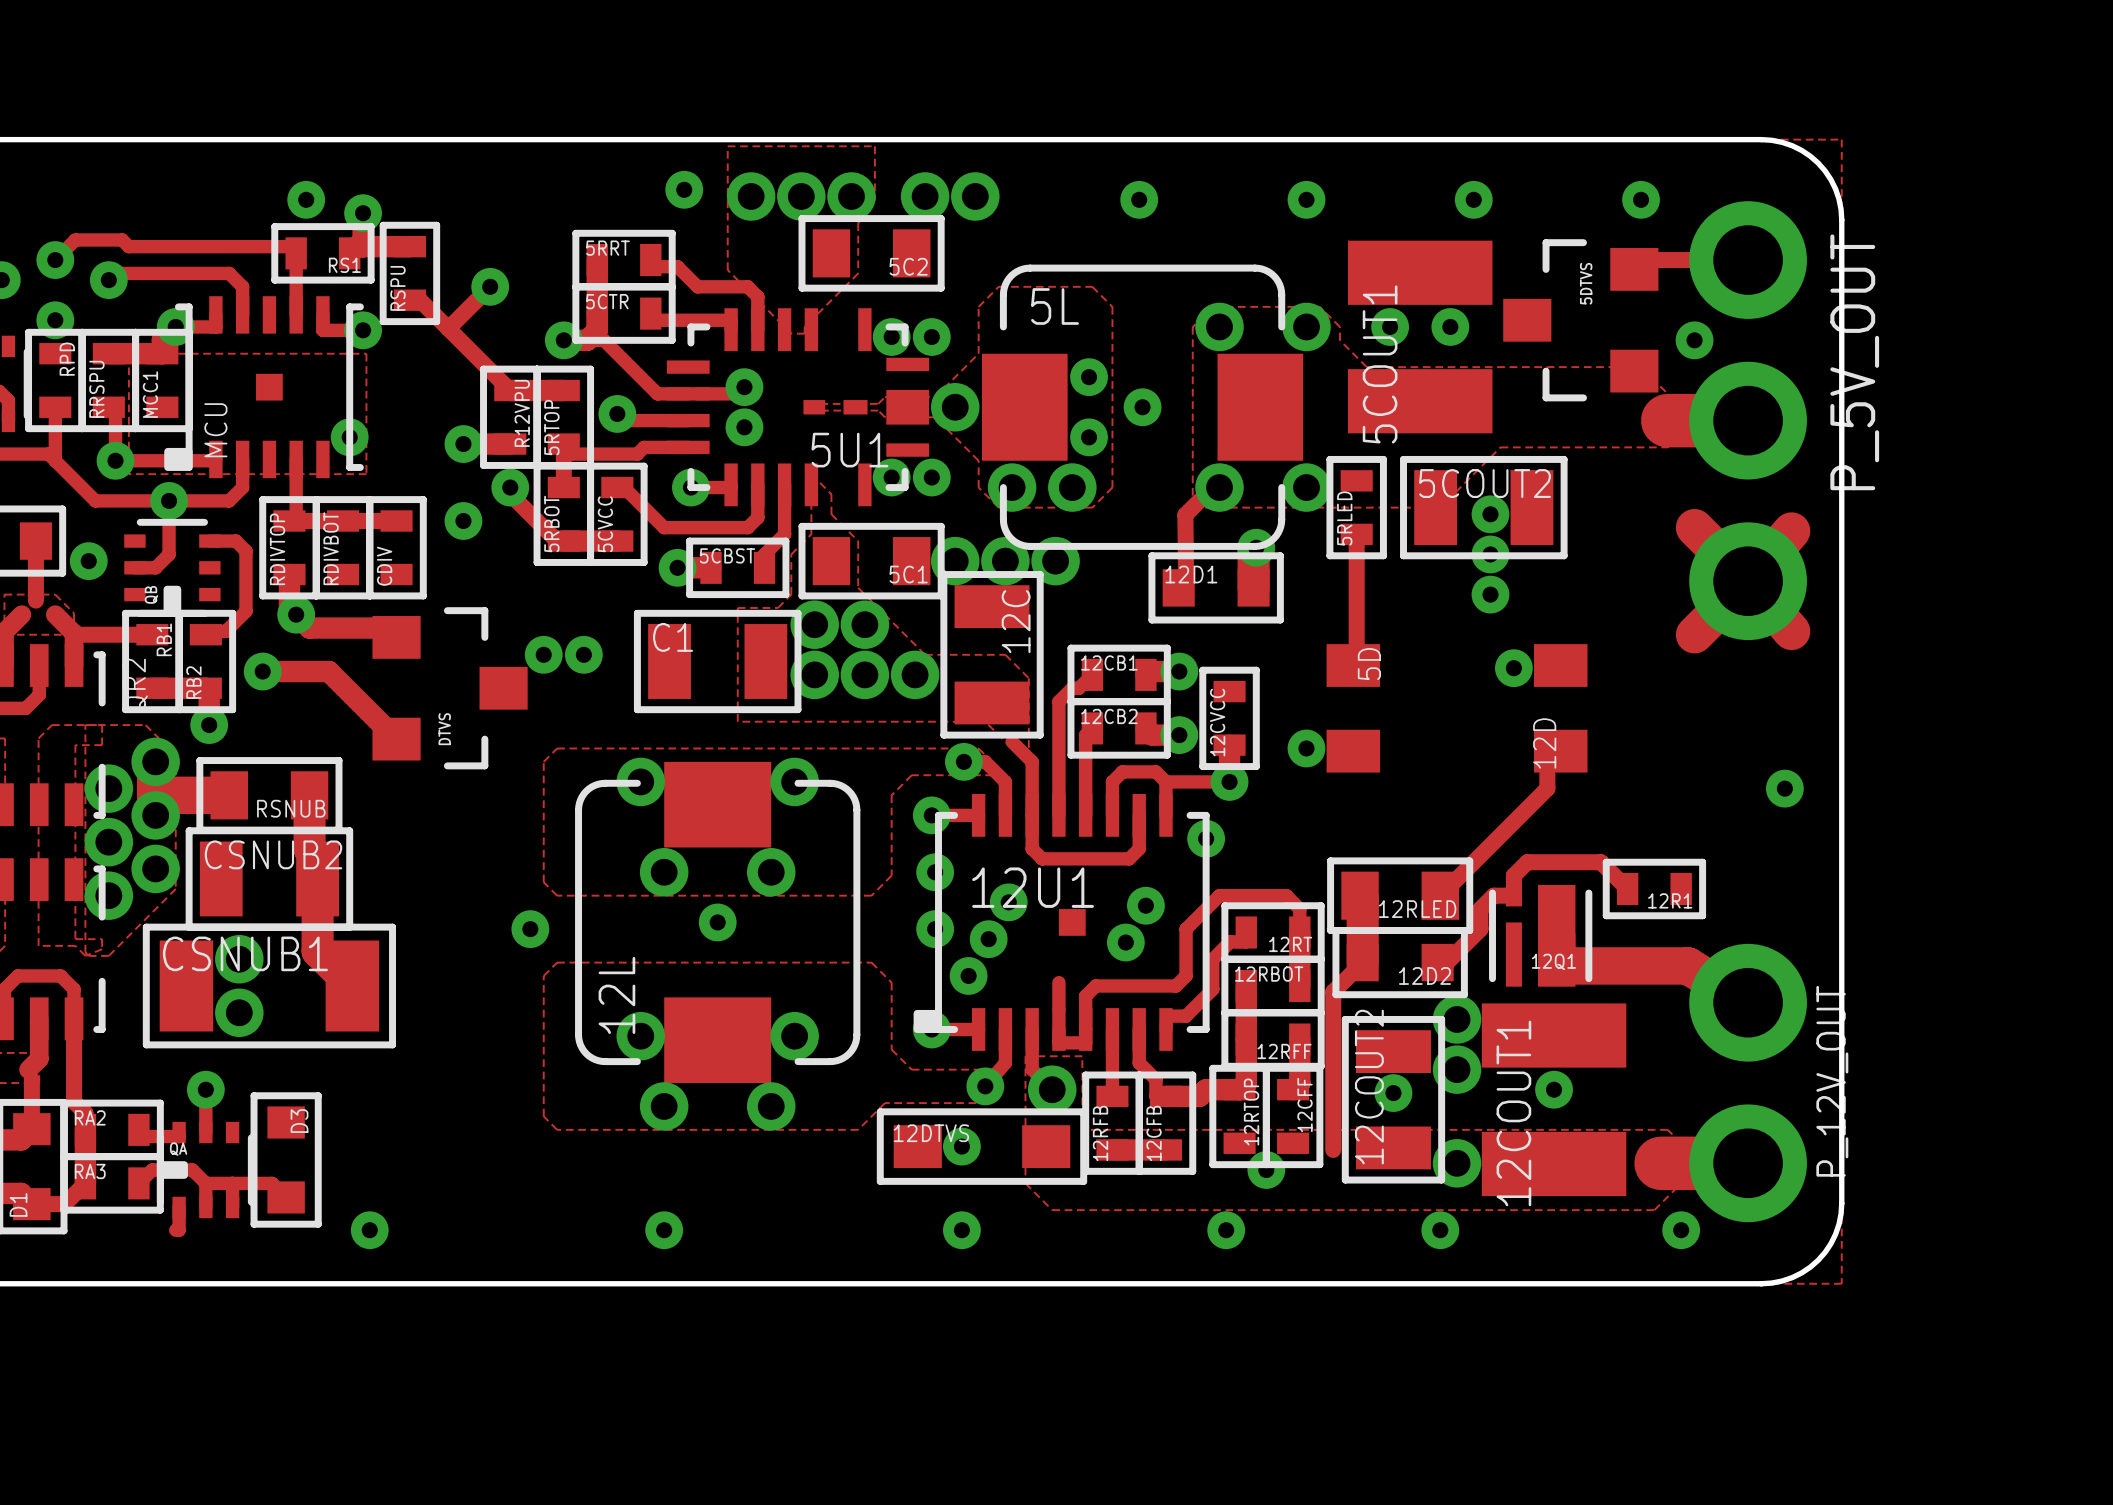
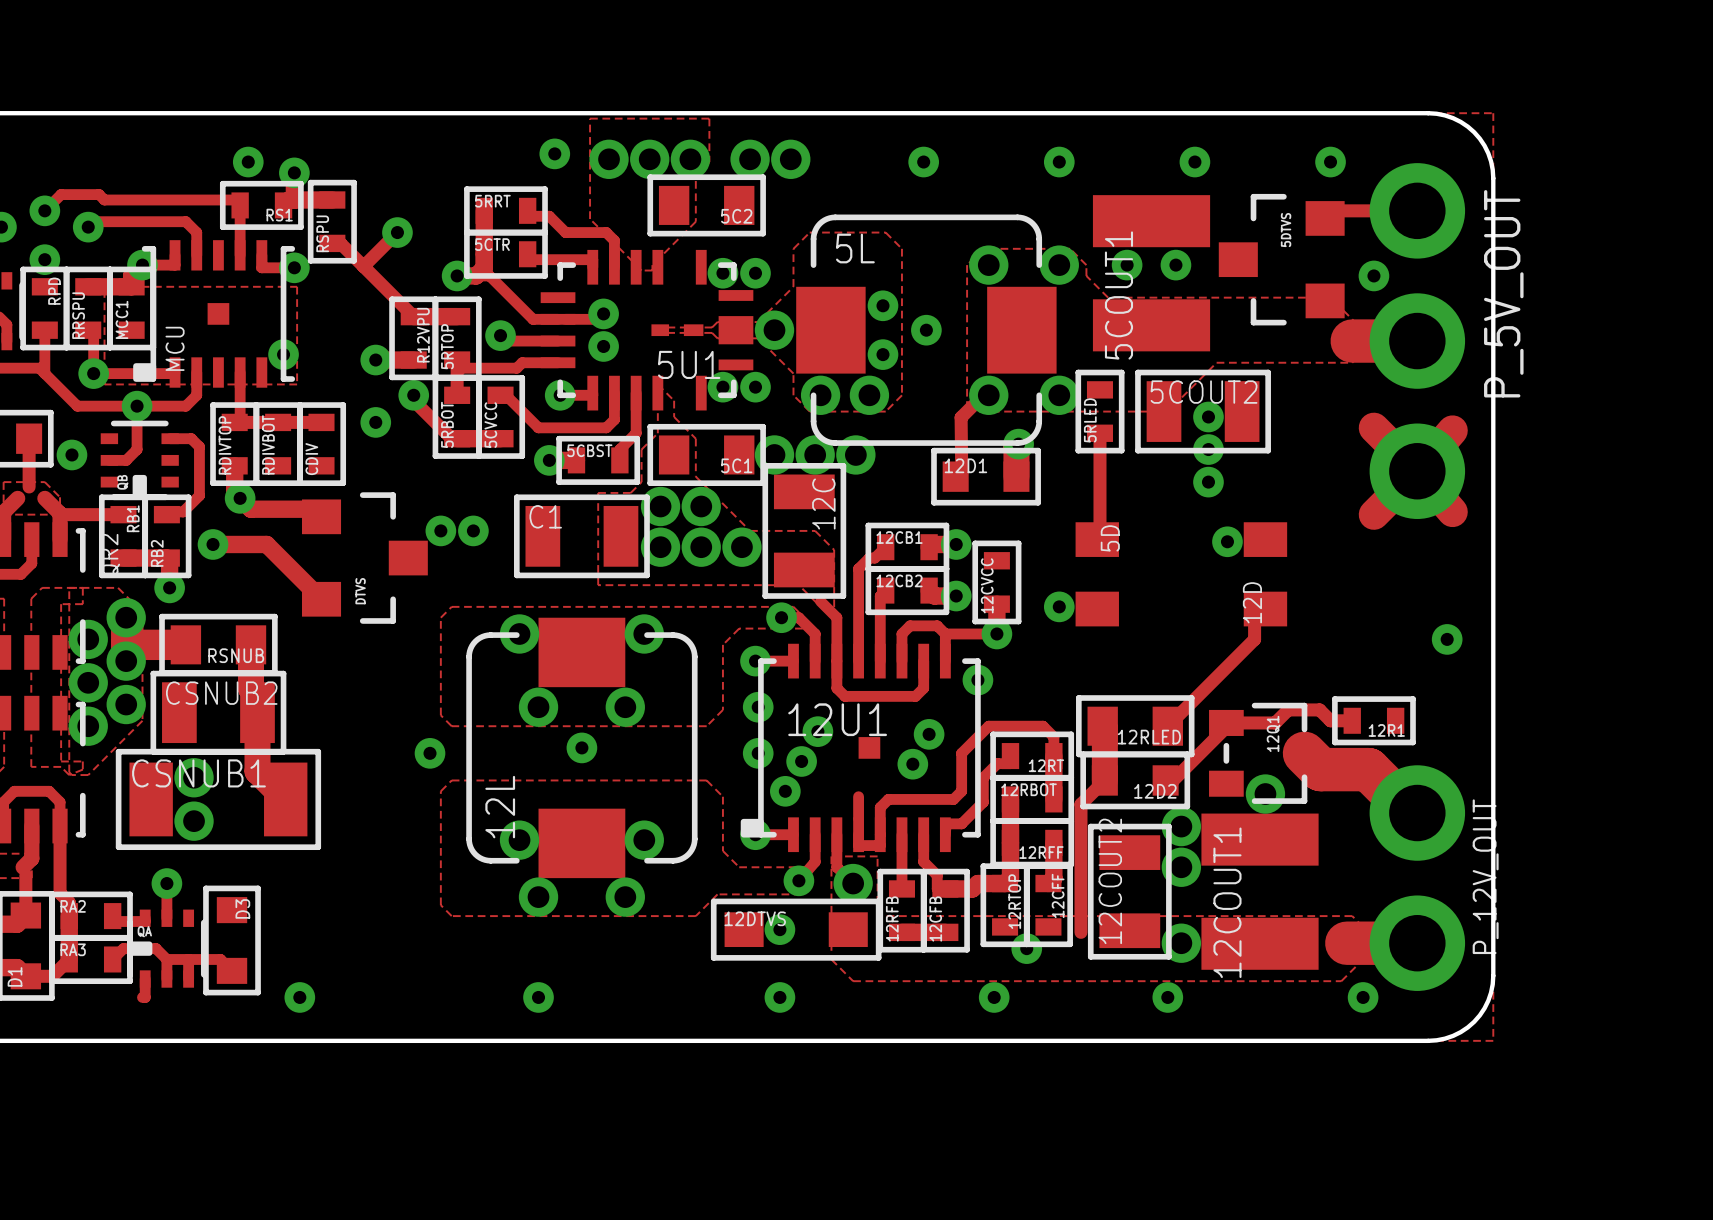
12Q1 footprint: [1489, 884, 1593, 987] -> [1209, 702, 1322, 804]
track: (1627, 888) (1600, 862) (1527, 862) (1513, 875) (1513, 895) (1493, 895) (1480, 909) (1480, 929) -> (1352, 720) (1330, 720) (1319, 709) (1288, 709) (1275, 722) (1226, 722) (1226, 727) (1200, 753)
12R1 position: (1654, 888) -> (1373, 720)
track: (1556, 935) (1556, 965) (1687, 965) (1748, 1002) -> (1304, 753) (1320, 769) (1368, 769) (1411, 813) (1417, 813)
via: none -> (1265, 794)
via: (1554, 1089) -> none
via: (1393, 1093) -> none

